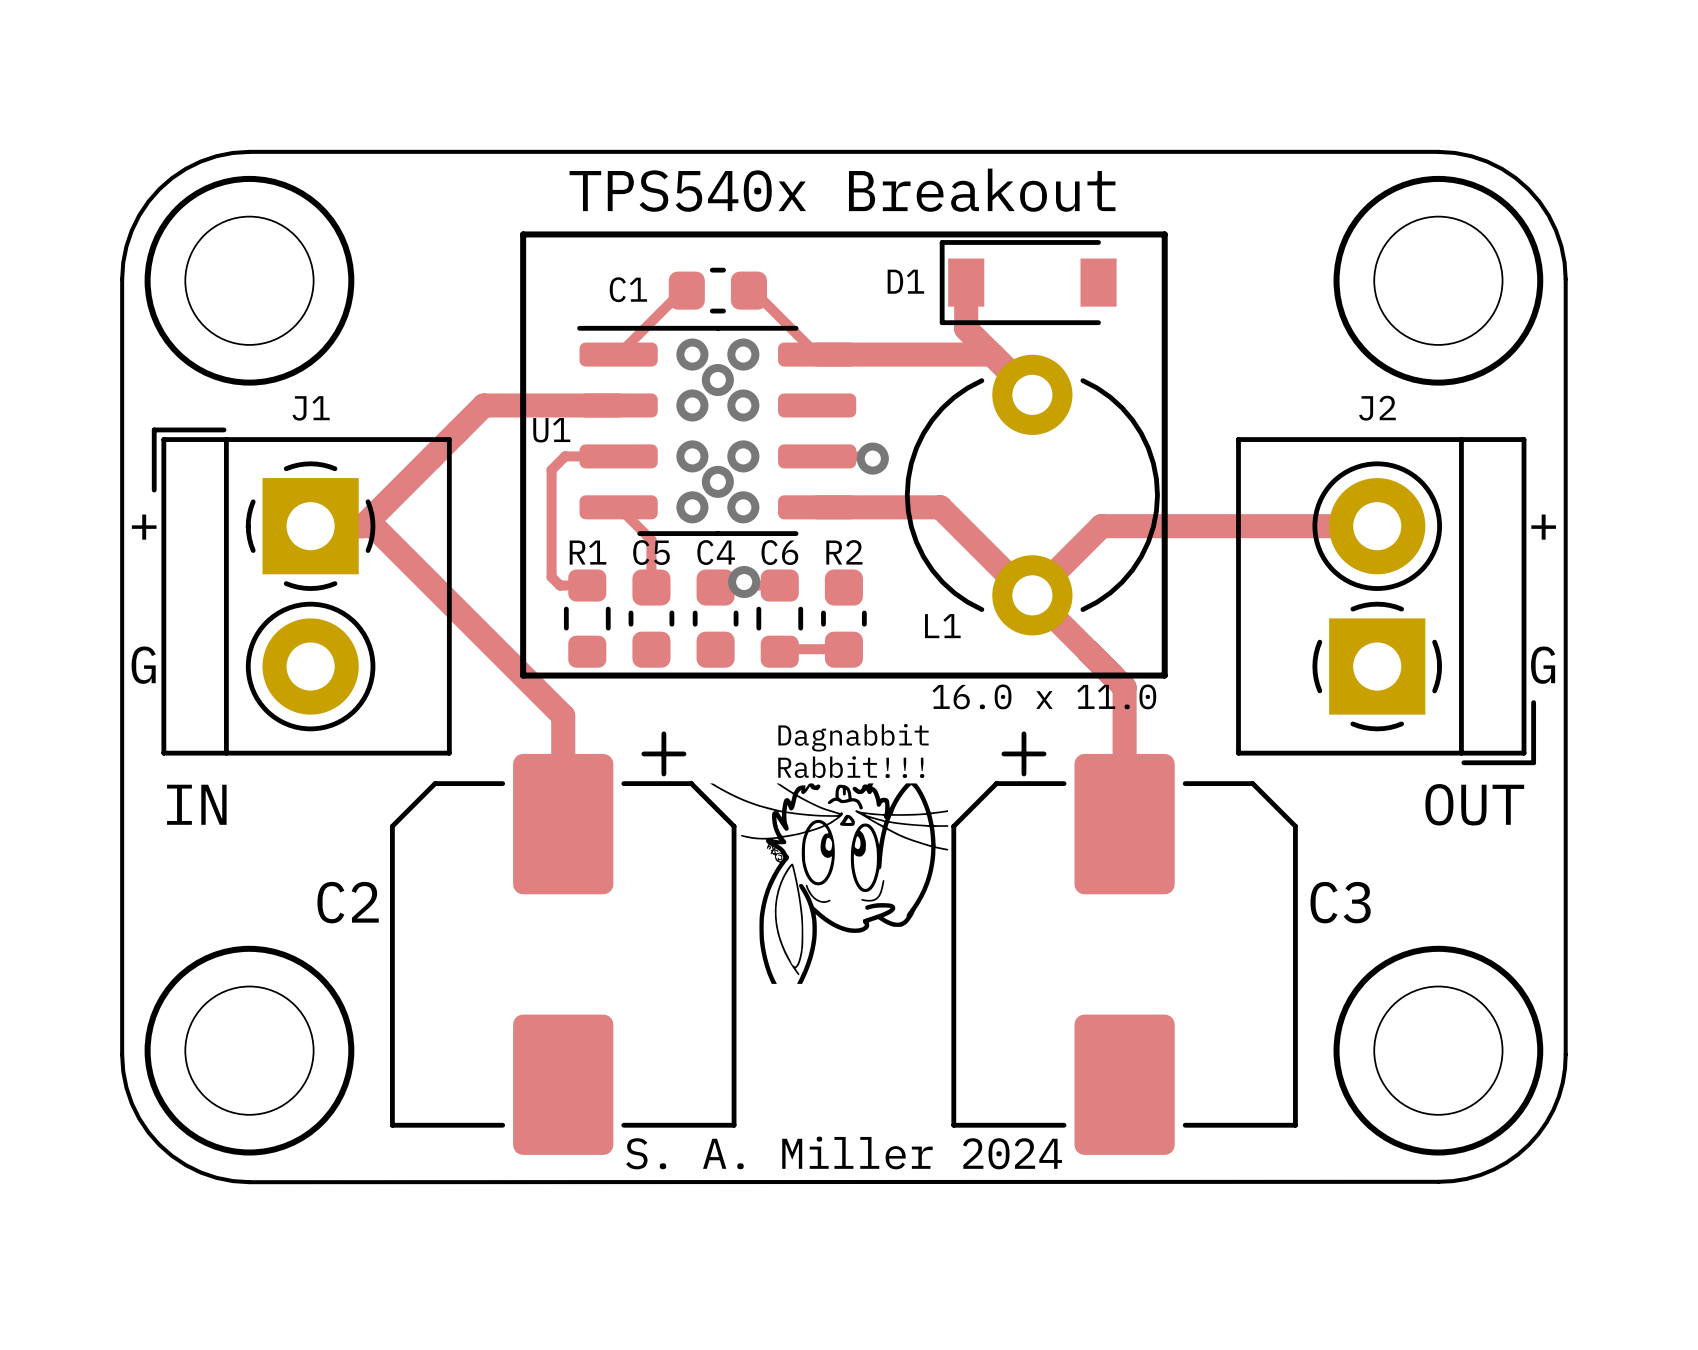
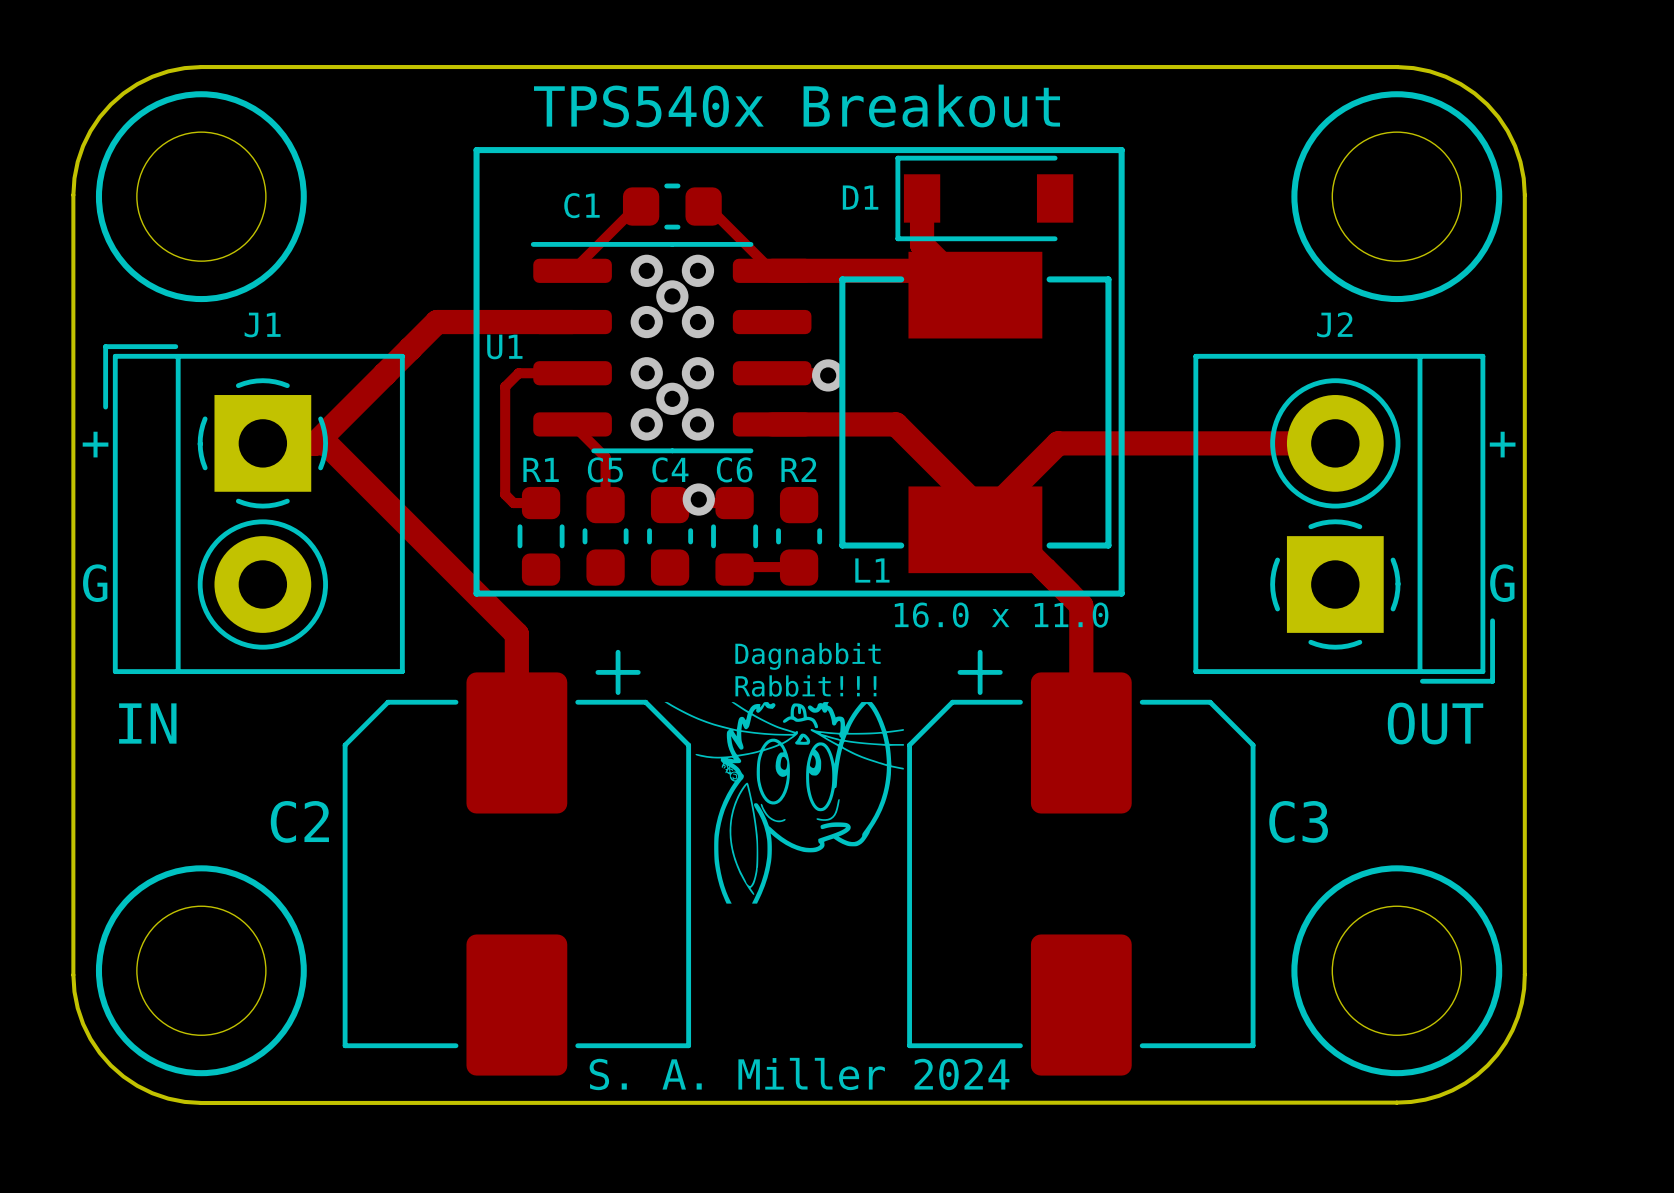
L1 footprint: [904, 354, 1160, 636] -> [839, 251, 1112, 574]

